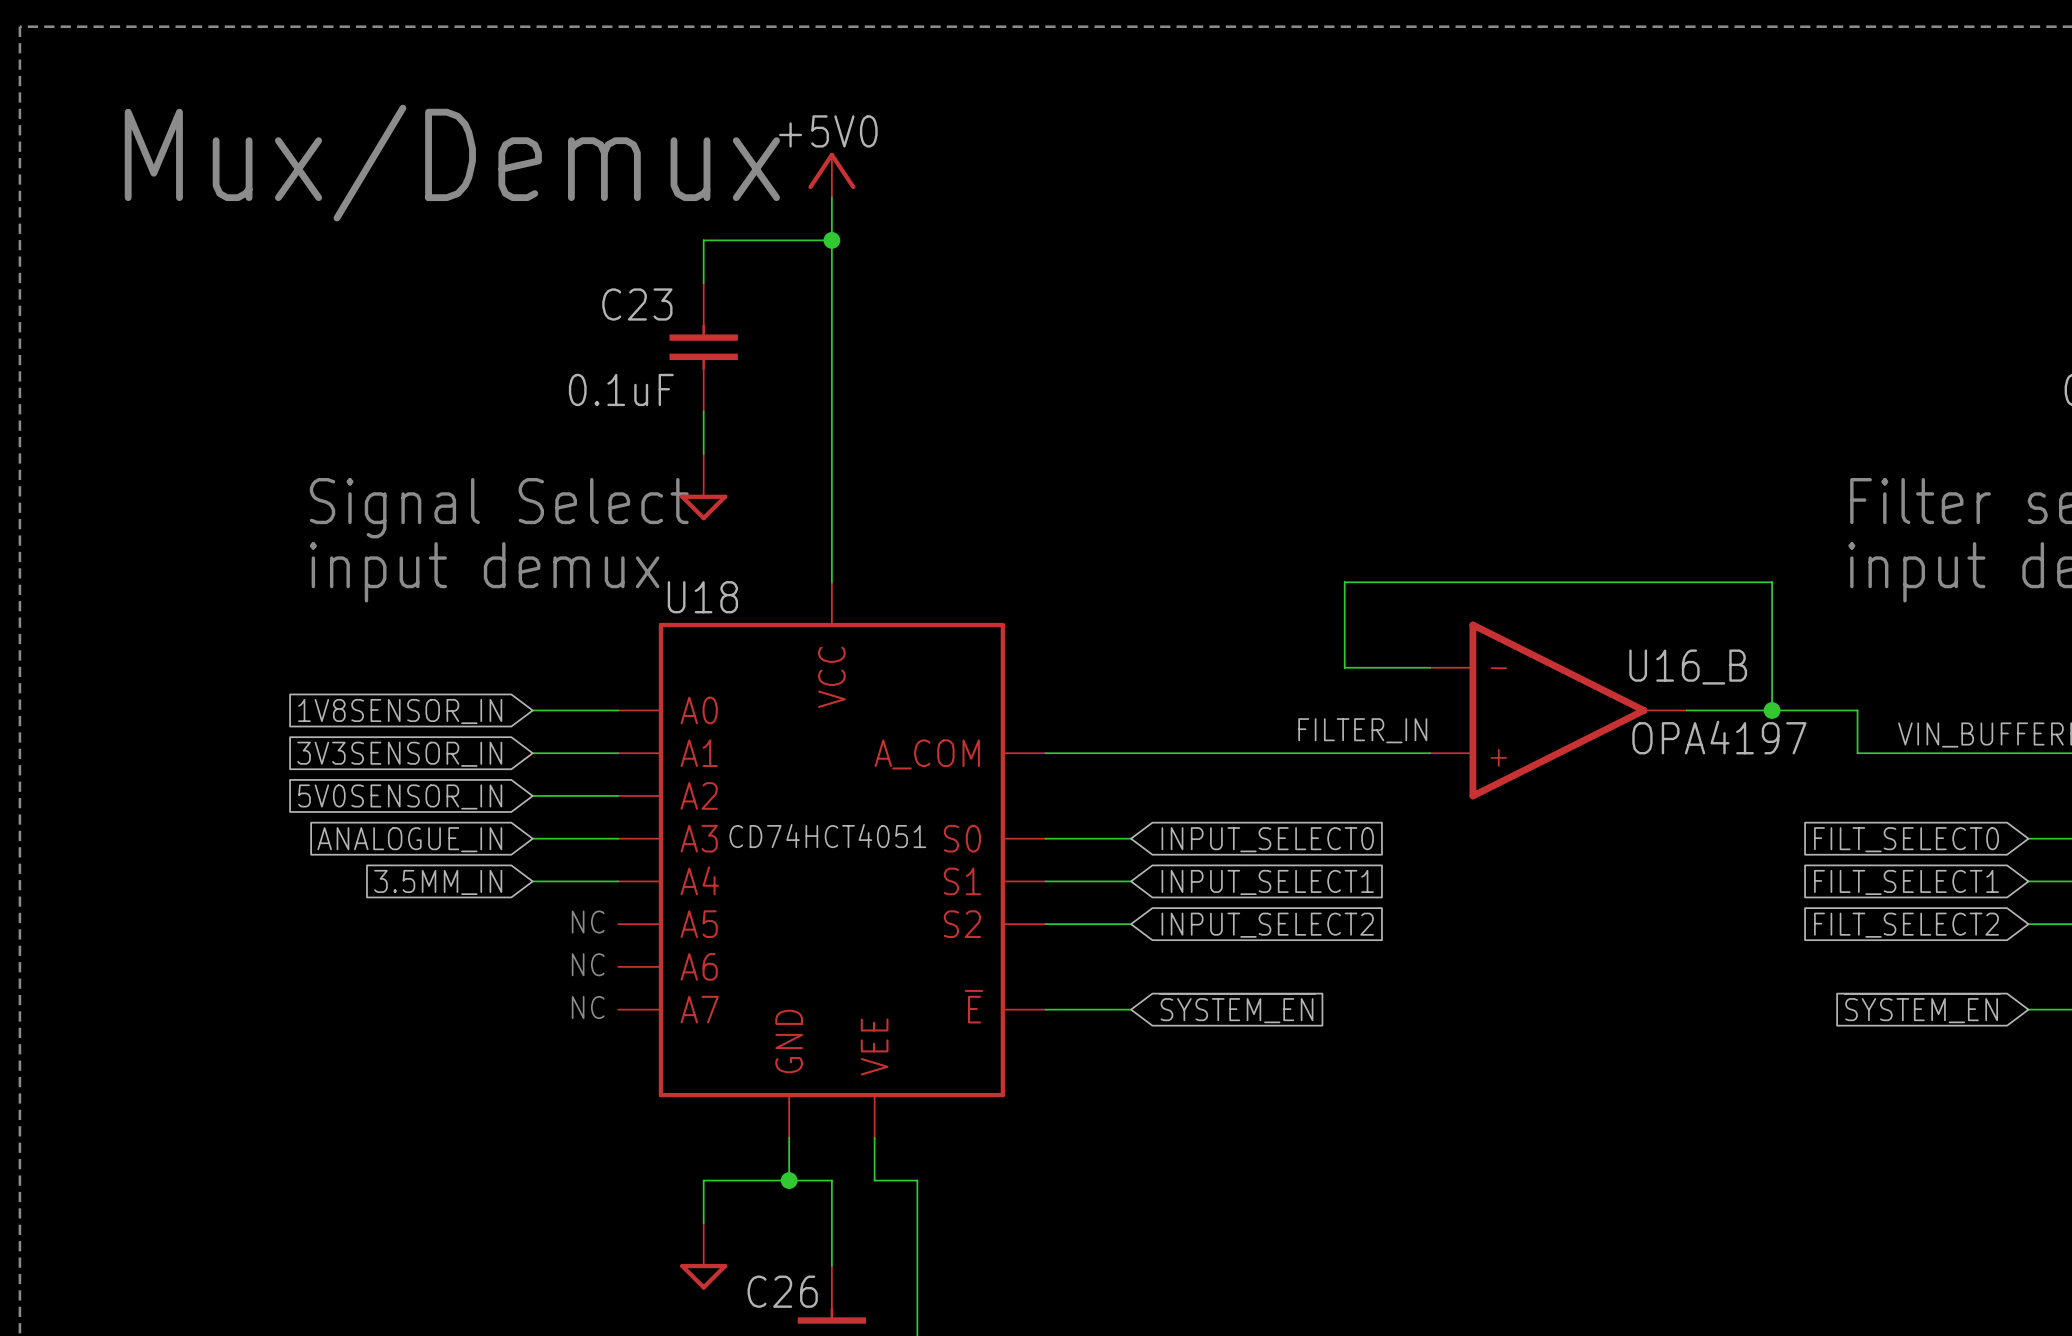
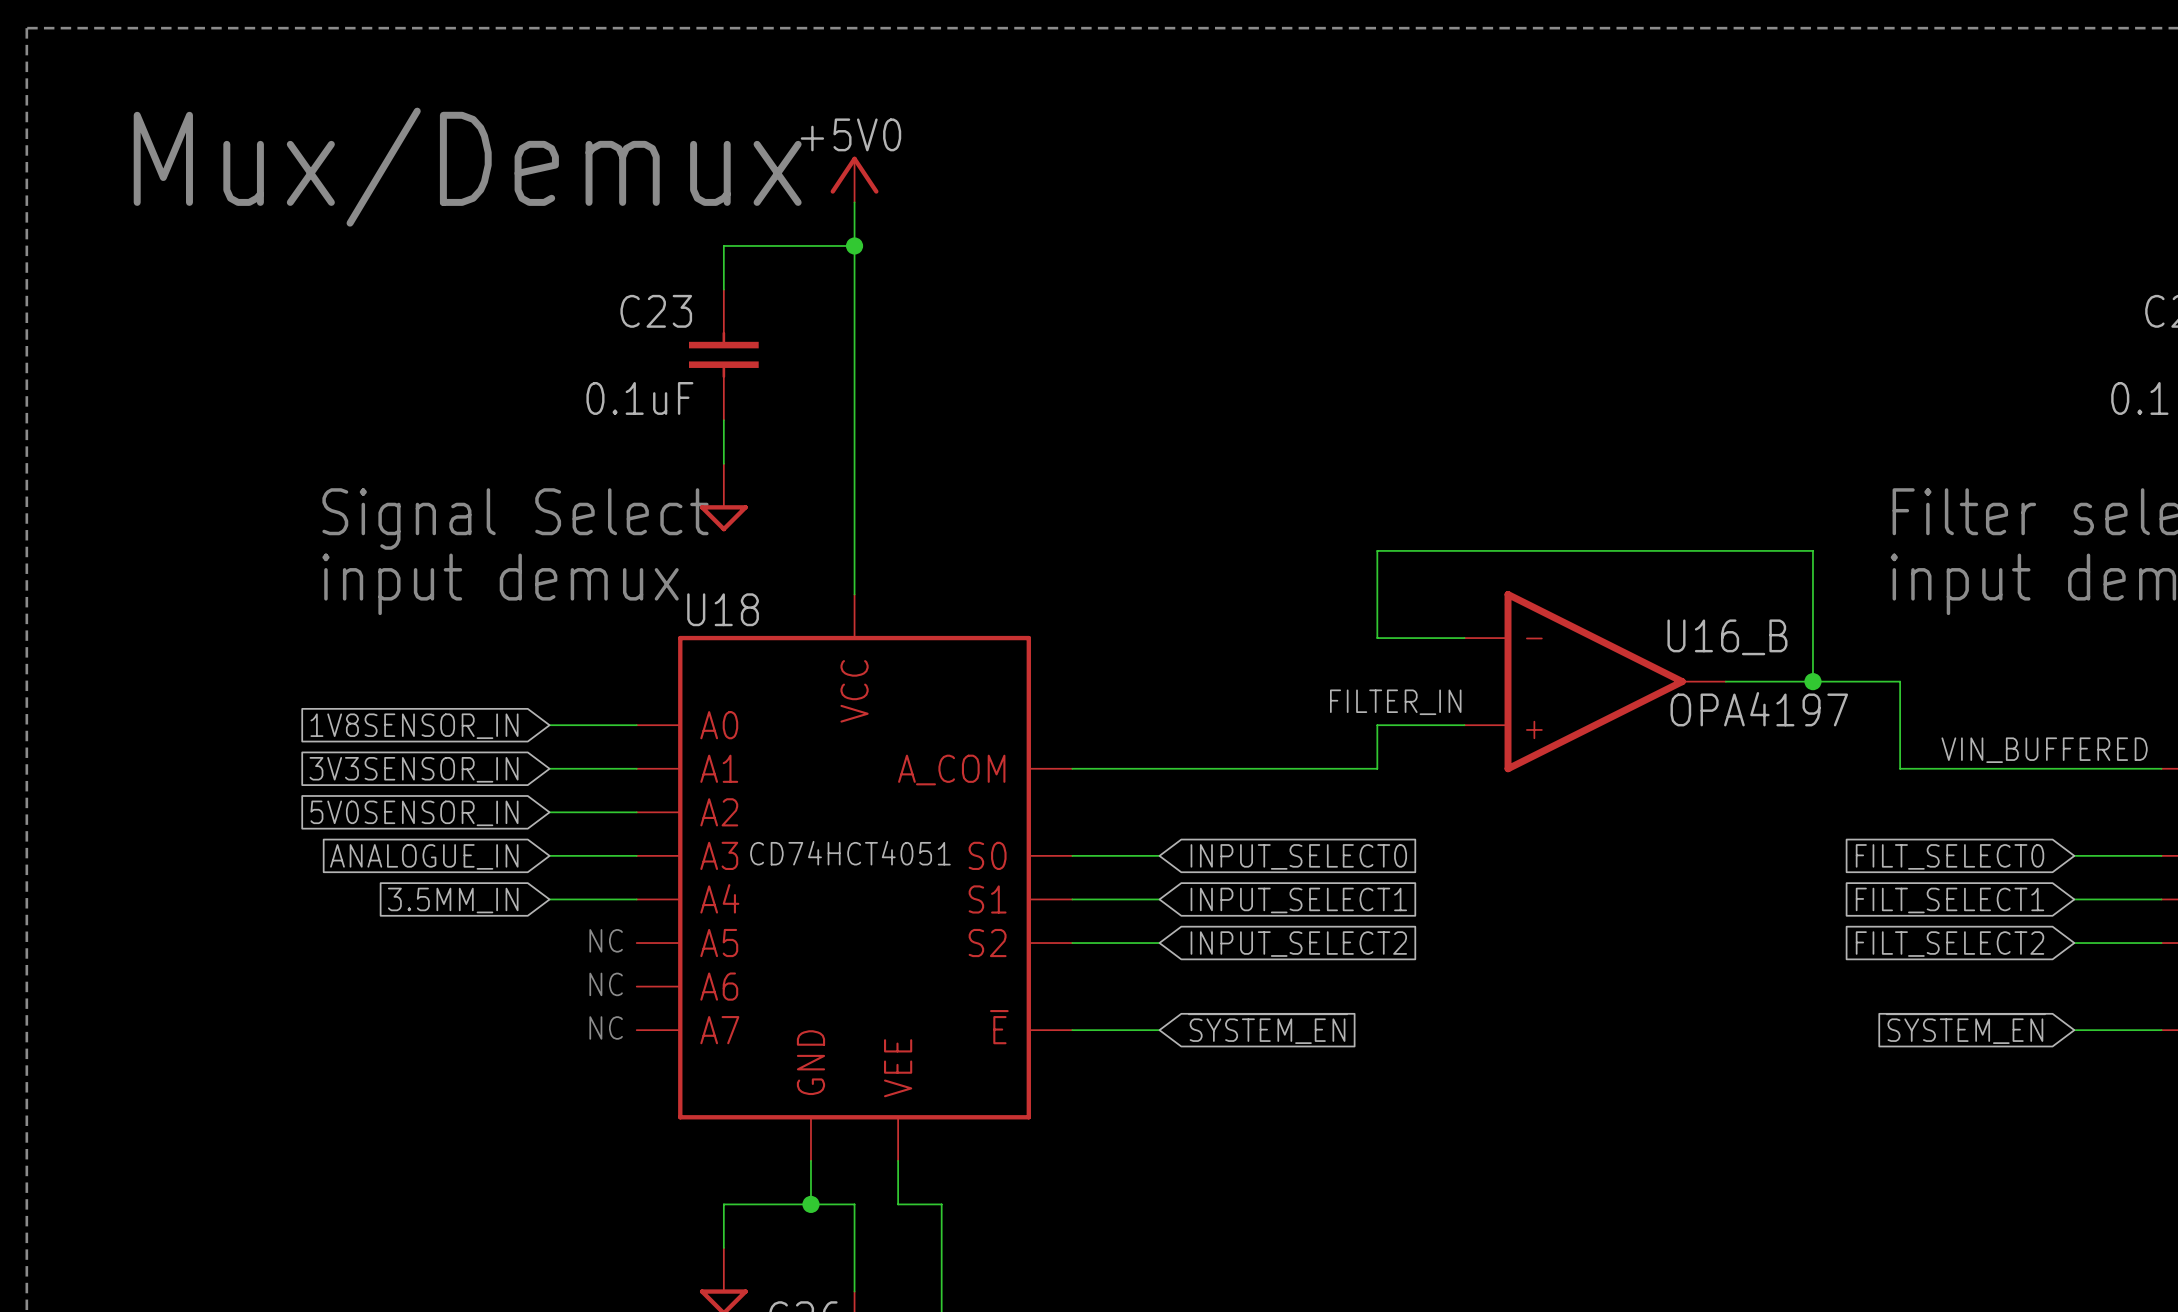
wire: (1344, 582) (1772, 582) -> (1377, 594) (1377, 550) (1812, 550) (1812, 594)
wire: (1344, 625) (1344, 667) (1430, 667) -> (1377, 638) (1464, 638)
wire: (1772, 667) (1772, 710) -> none
U16_B position: (1558, 710) -> (1595, 681)
wire: (1686, 710) (1857, 710) -> (1725, 681) (1900, 681) (1900, 725)
junction position: (1772, 710) -> (1812, 681)
label position: FILTER_IN (1362, 730) -> FILTER_IN (1395, 702)
wire: (1344, 753) (1430, 753) -> (1377, 768) (1377, 725) (1464, 725)

